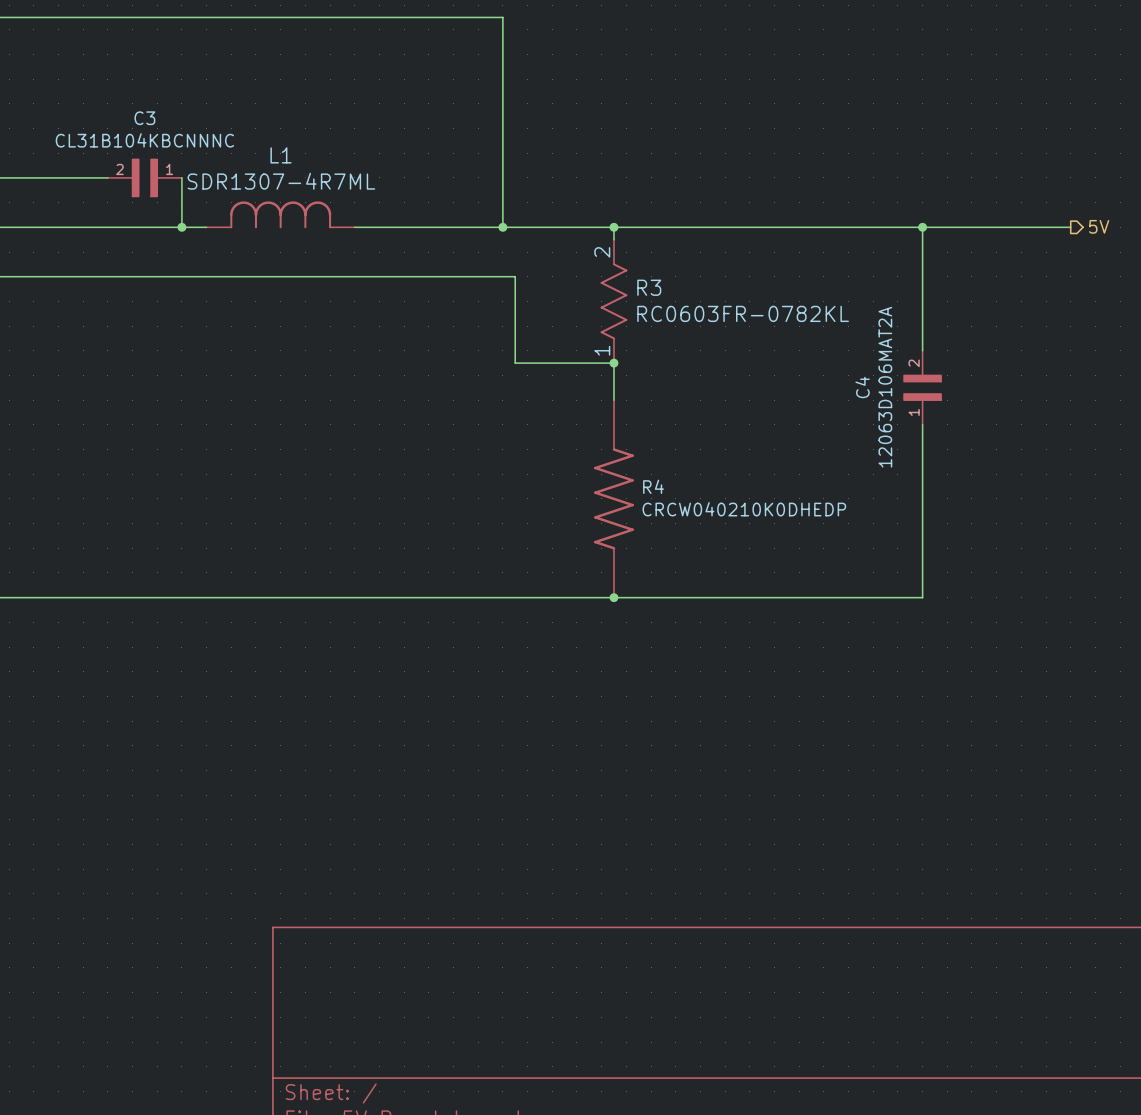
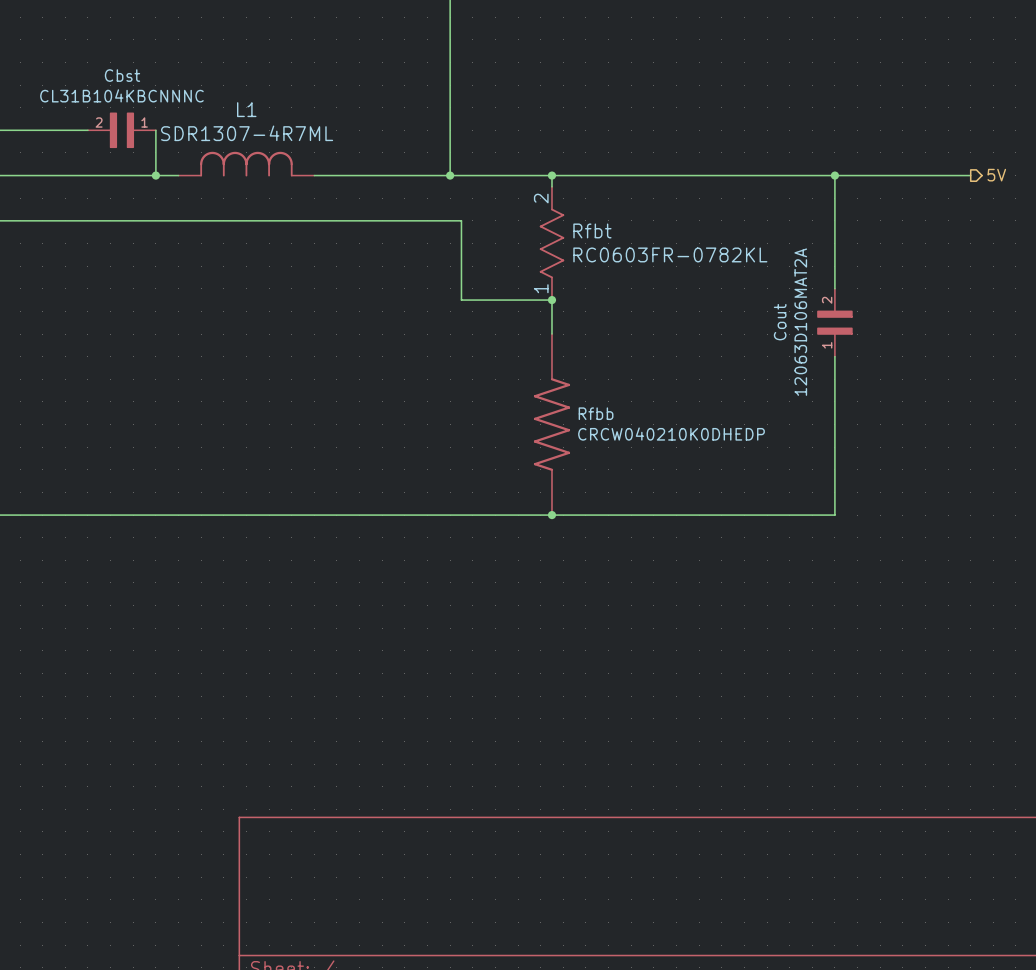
C3 name: C3 (144, 118) -> Cbst (122, 75)
R3 name: R3 (649, 287) -> Rfbt (592, 230)
C4 name: C4 (862, 387) -> Cout (780, 322)
R4 name: R4 (653, 486) -> Rfbb (596, 413)

